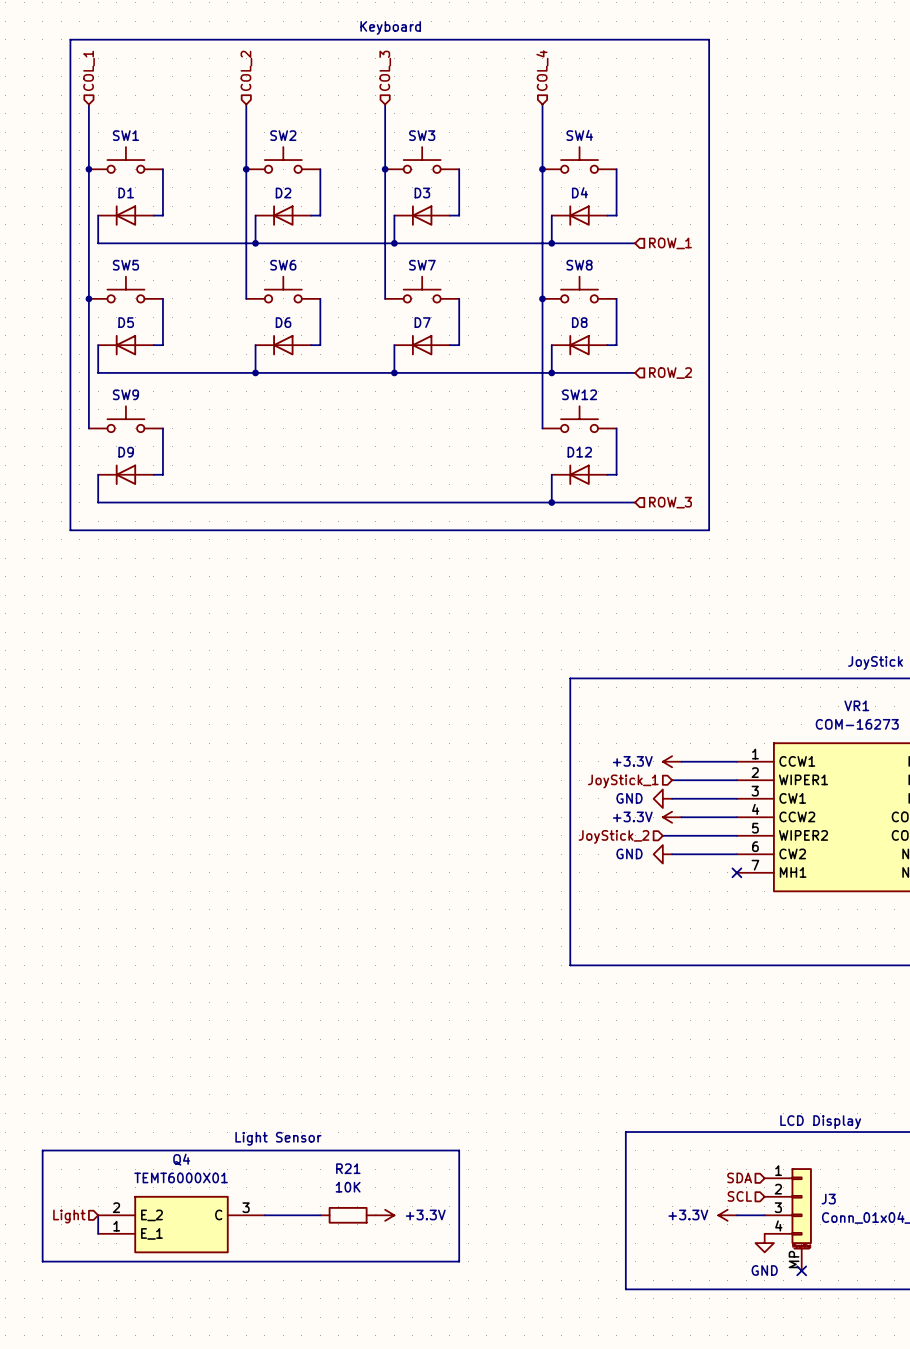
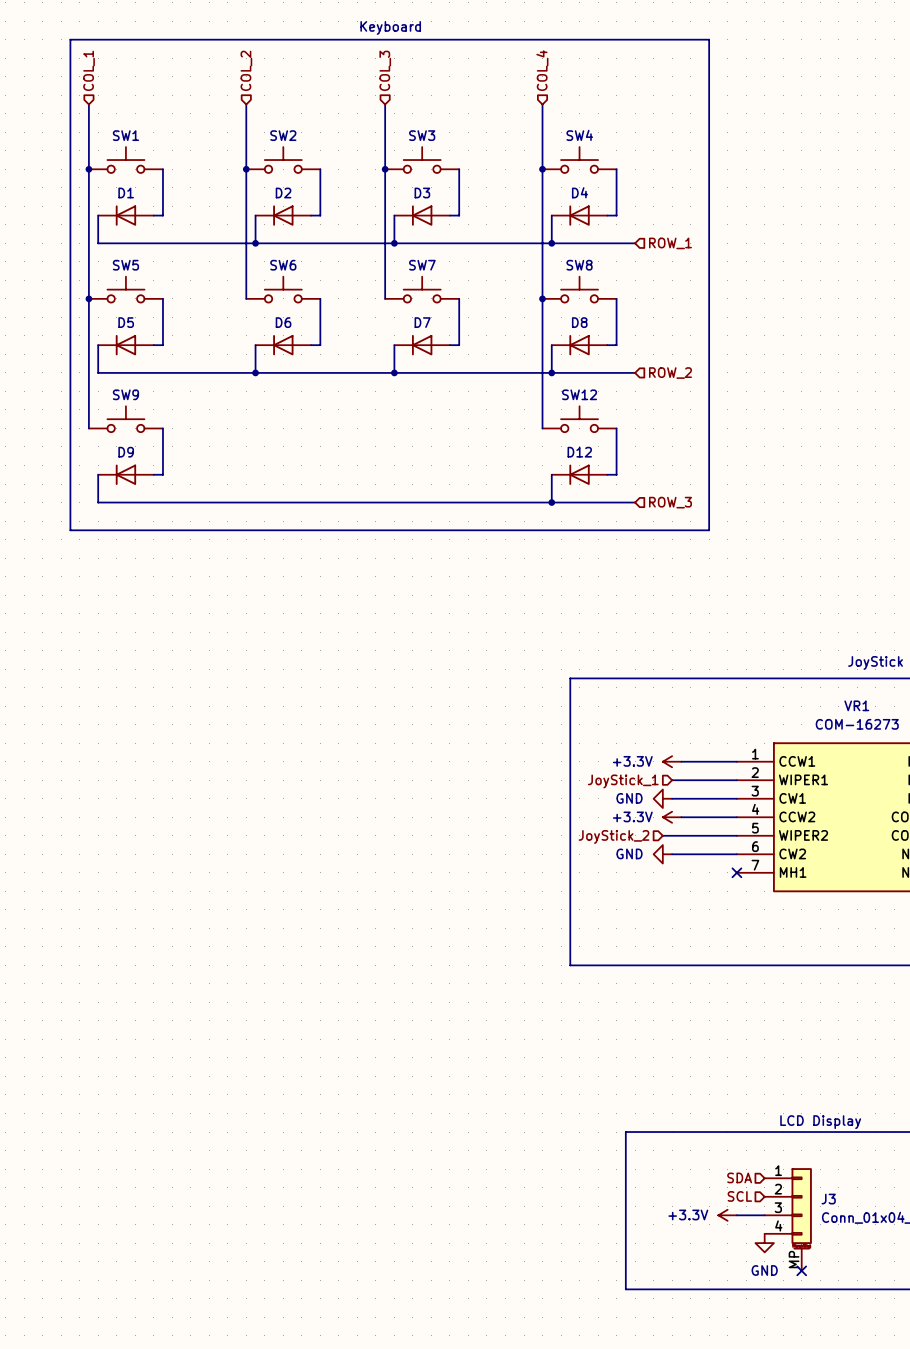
text: Light Sensor (278, 1138) -> none
line: (42, 1150) (459, 1150) (459, 1261) (42, 1261) (42, 1150) -> none
wire: (98, 1215) (98, 1233) -> none
wire: (264, 1215) (320, 1215) -> none
R21: 10K (348, 1215) -> none
power symbol: +3.3V (385, 1215) -> none
hierarchical label: Light (69, 1216) -> none
Q4: TEMT6000X01 (181, 1224) -> none

